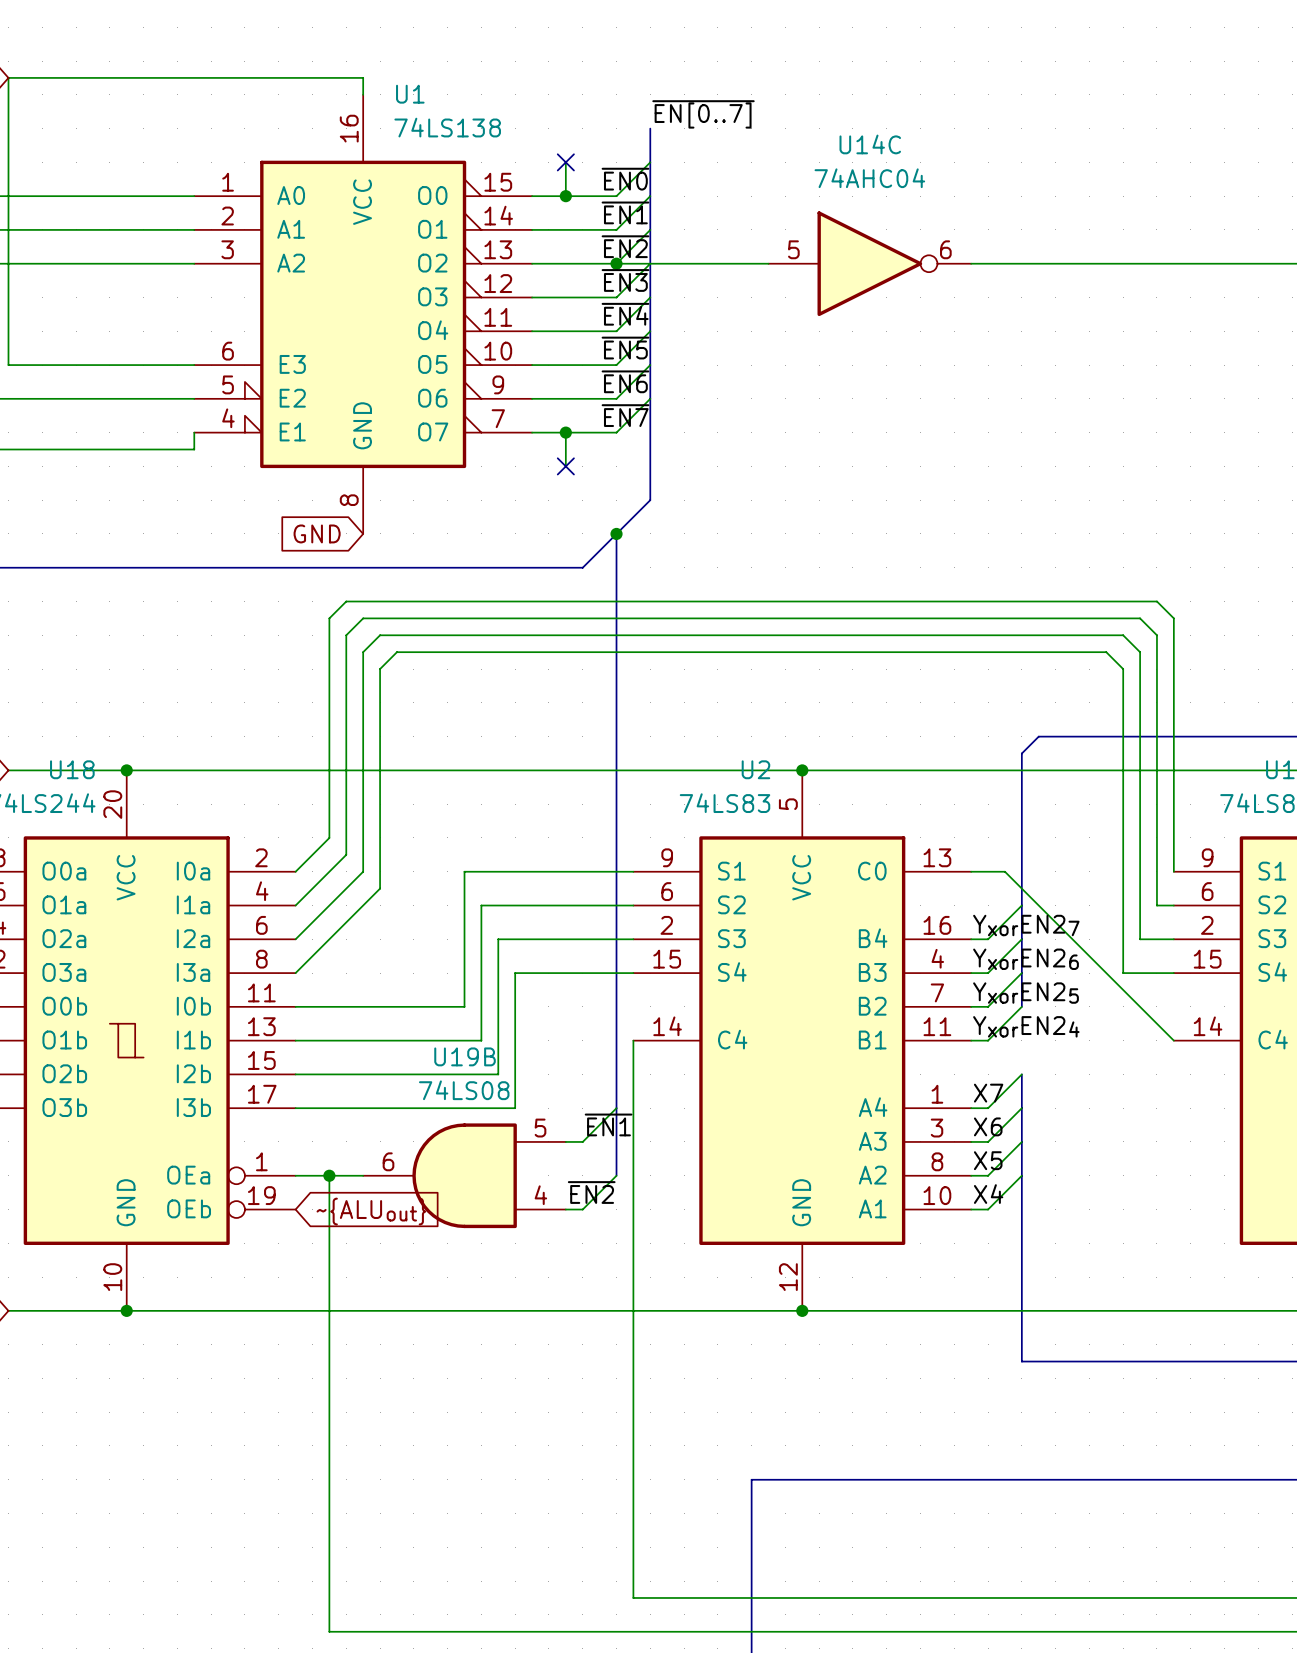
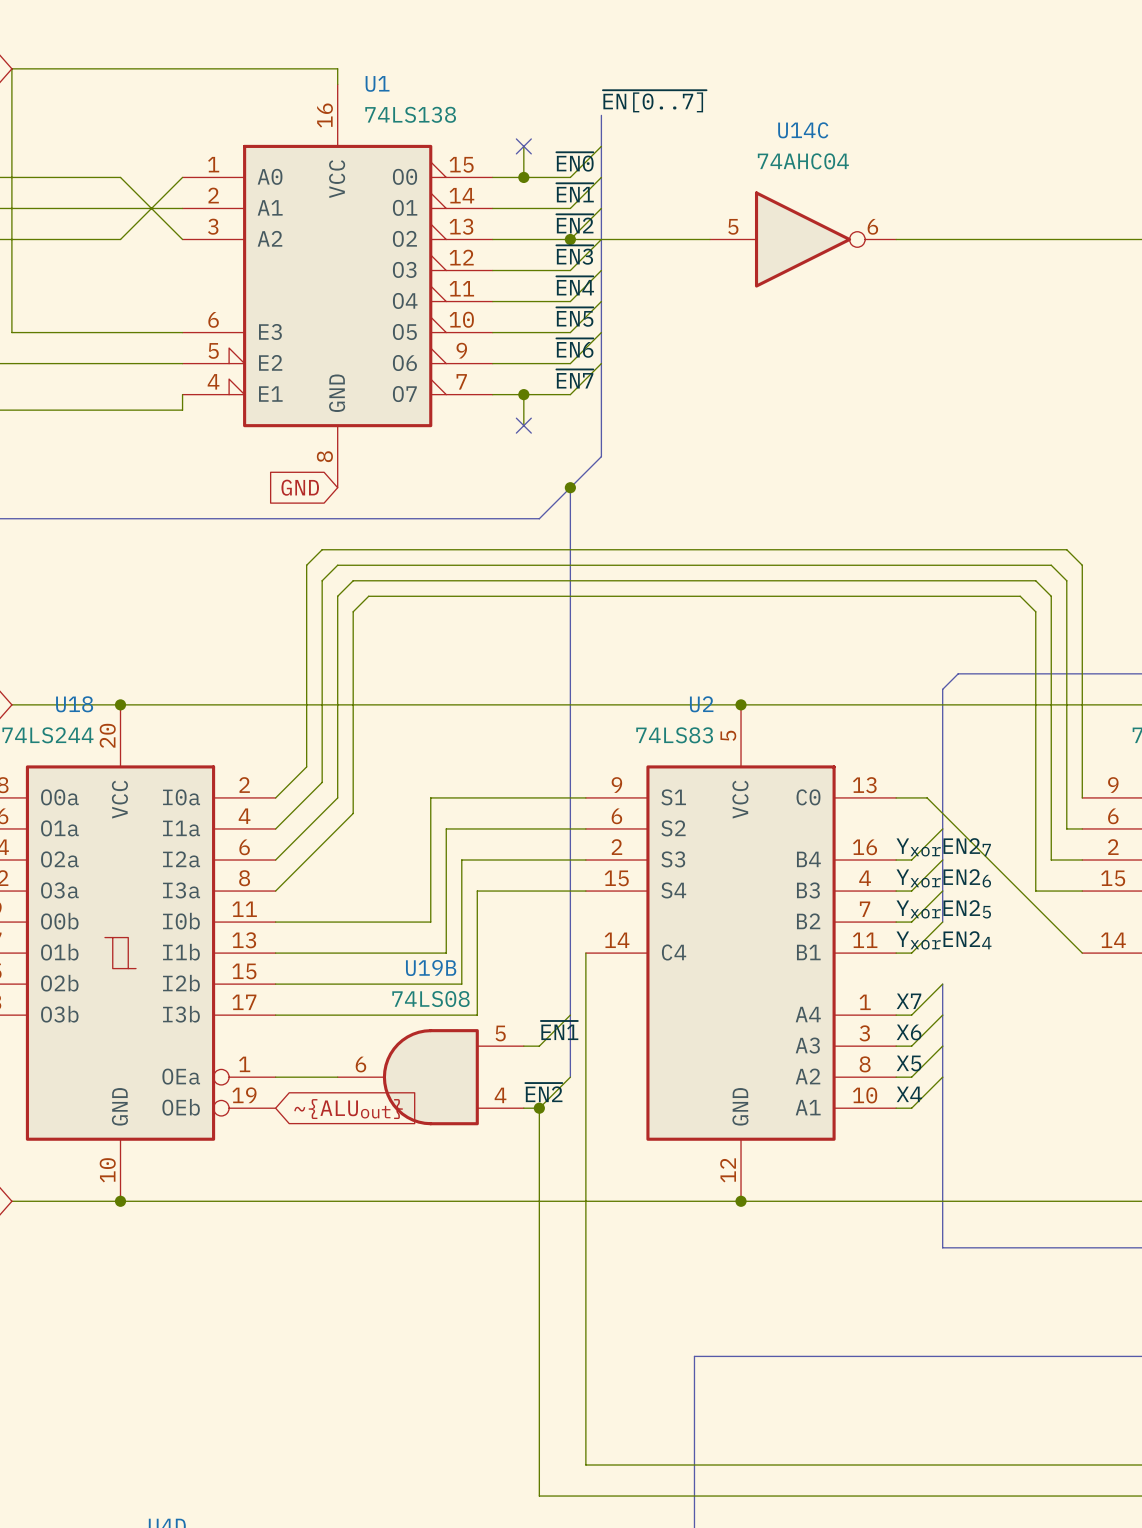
wire: (126, 196) (194, 196) -> (120, 177) (182, 239)
wire: (126, 263) (194, 263) -> (120, 239) (182, 177)
wire: (329, 1175) (329, 1631) (582, 1631) -> (539, 1108) (539, 1496)
junction: (329, 1175) -> none
junction: none -> (539, 1108)

